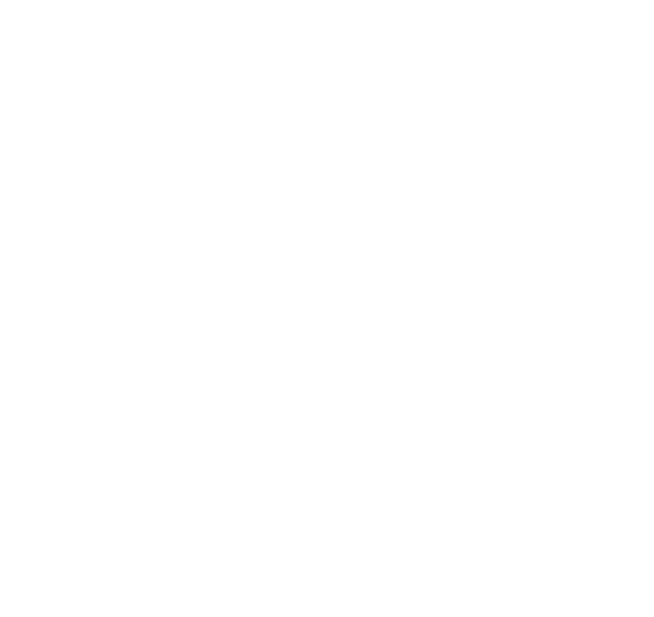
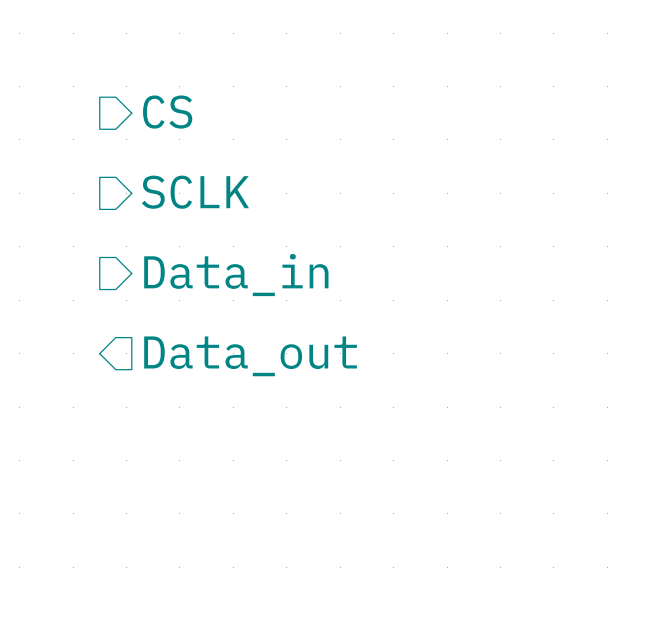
sheet pin: none -> CS (167, 112)
sheet pin: none -> SCLK (195, 192)
sheet pin: none -> Data_in (236, 275)
sheet pin: none -> Data_out (250, 356)

